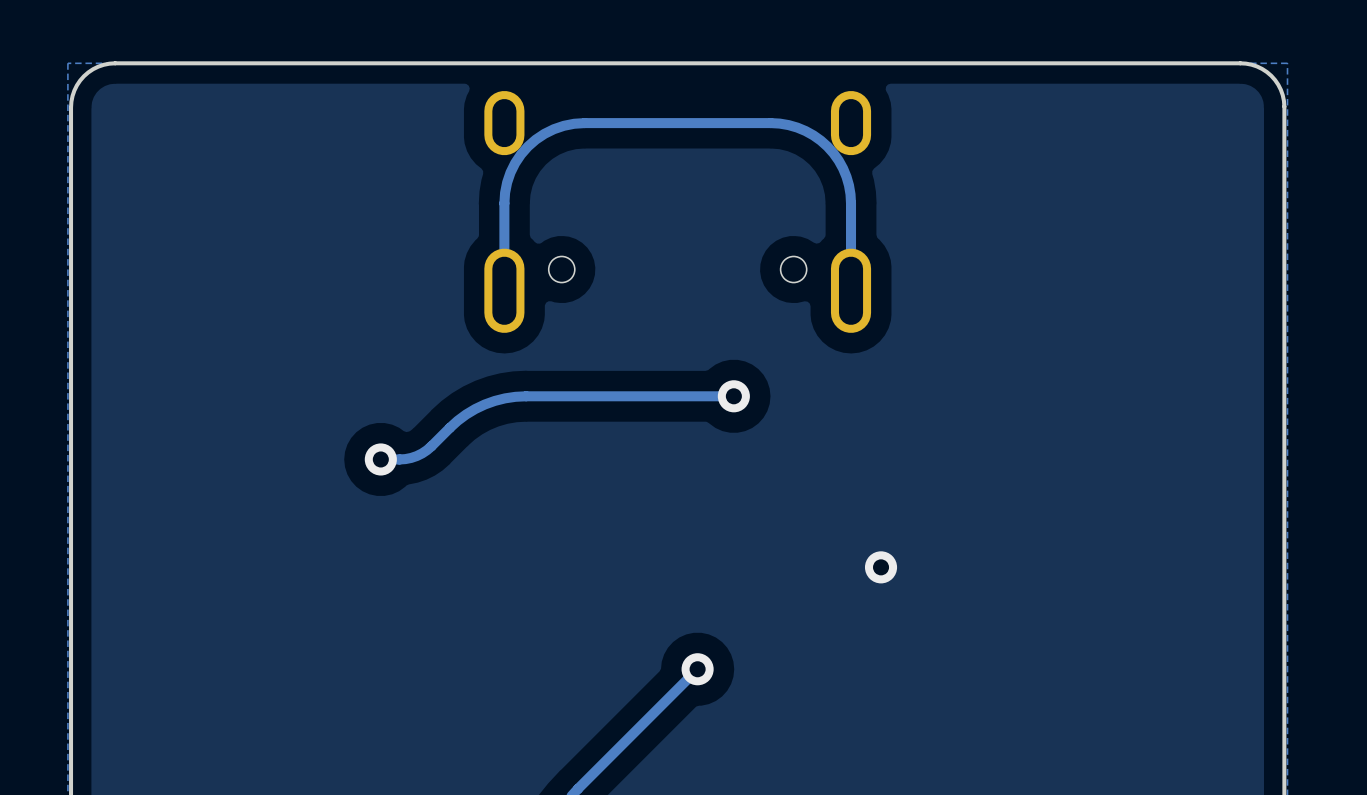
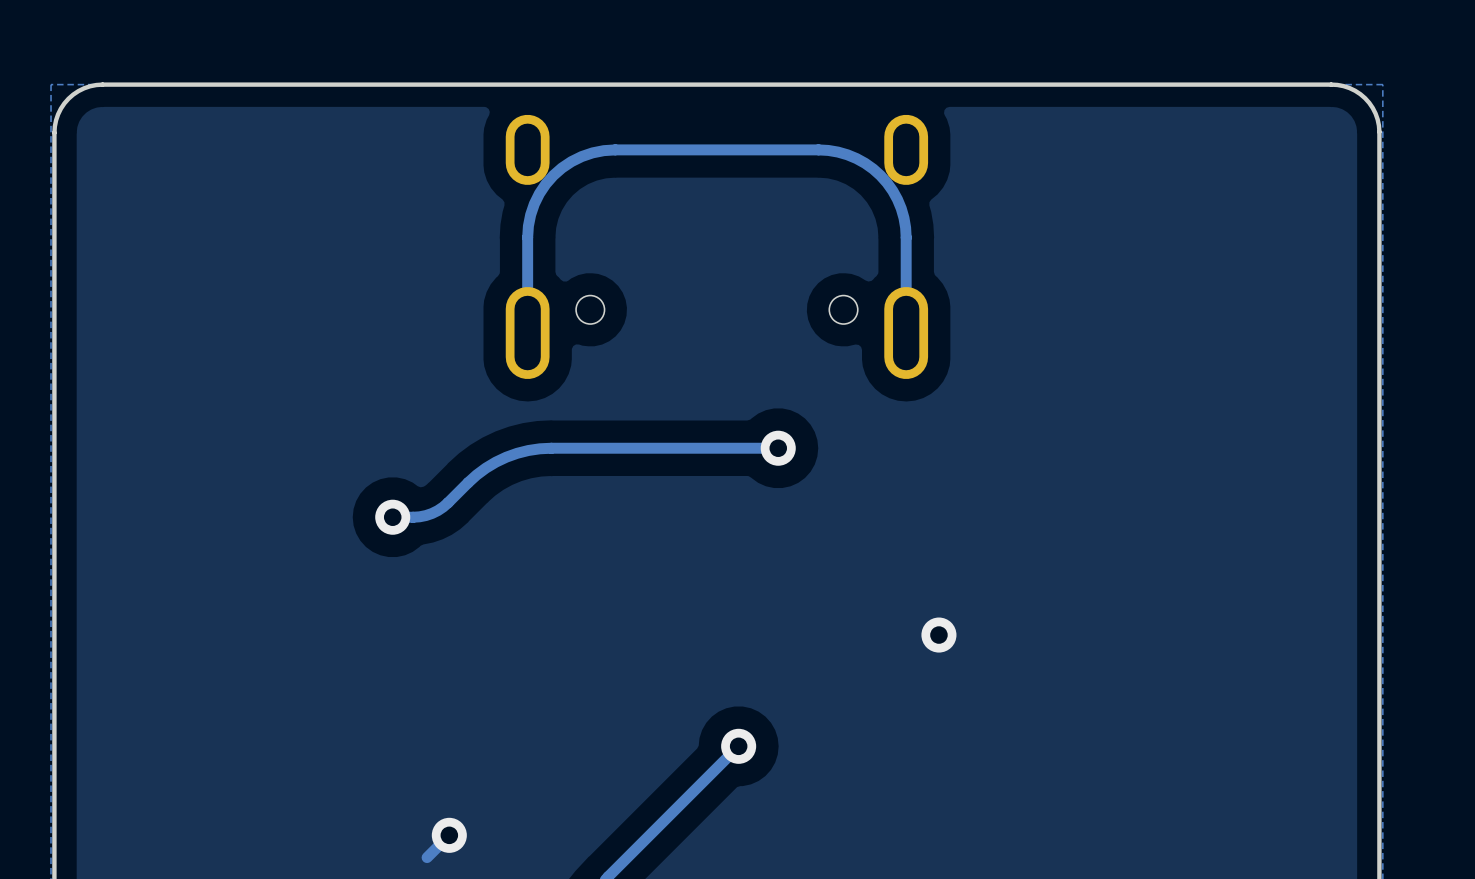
track: none -> (449, 835) (427, 857)
via: none -> (449, 835)

